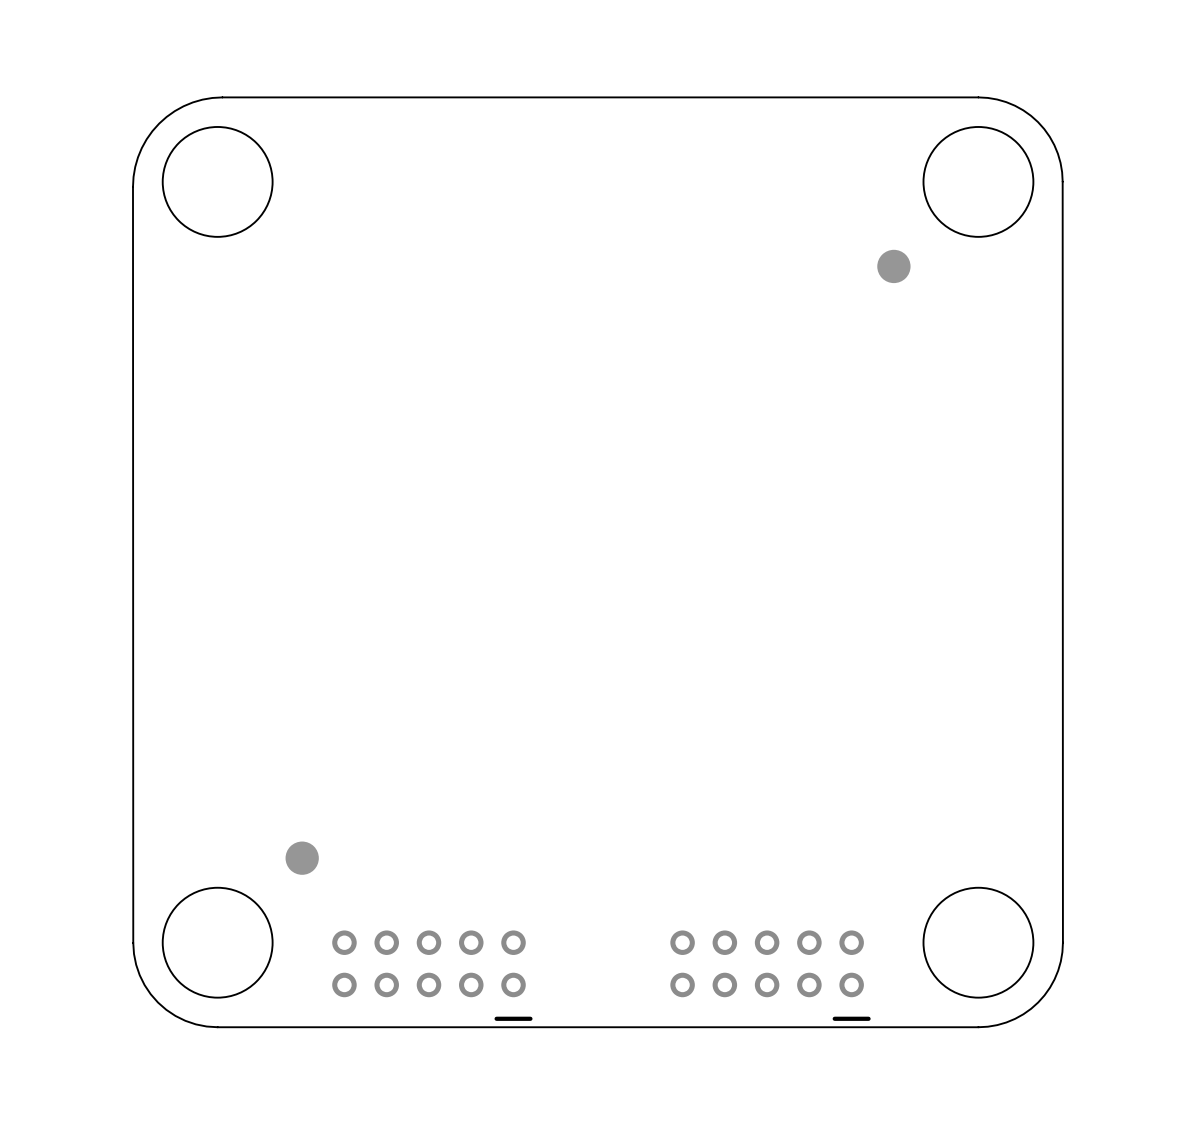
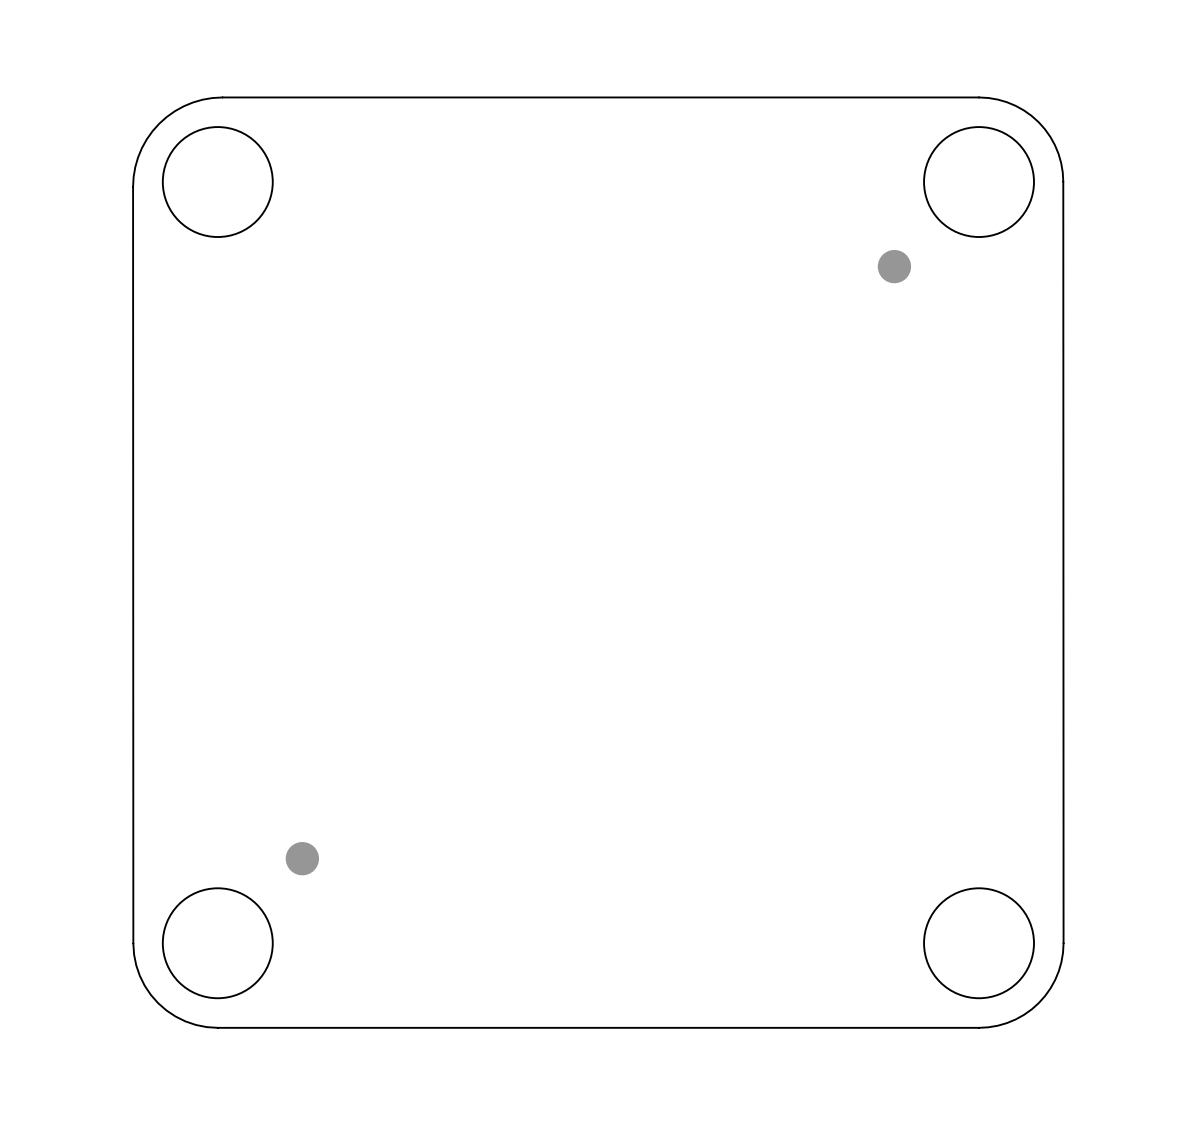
part: (432, 975) -> none
part: (770, 975) -> none

